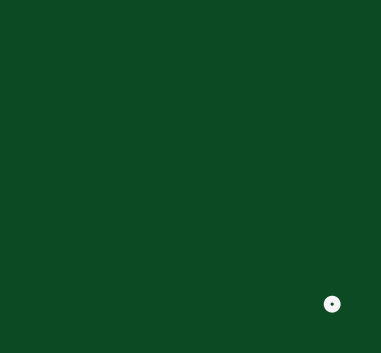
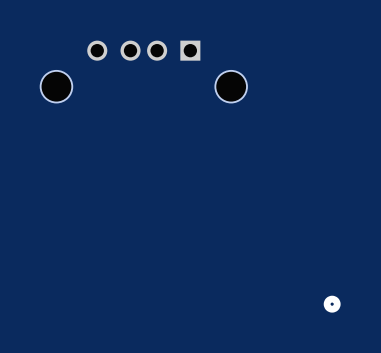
part: none -> (143, 71)

